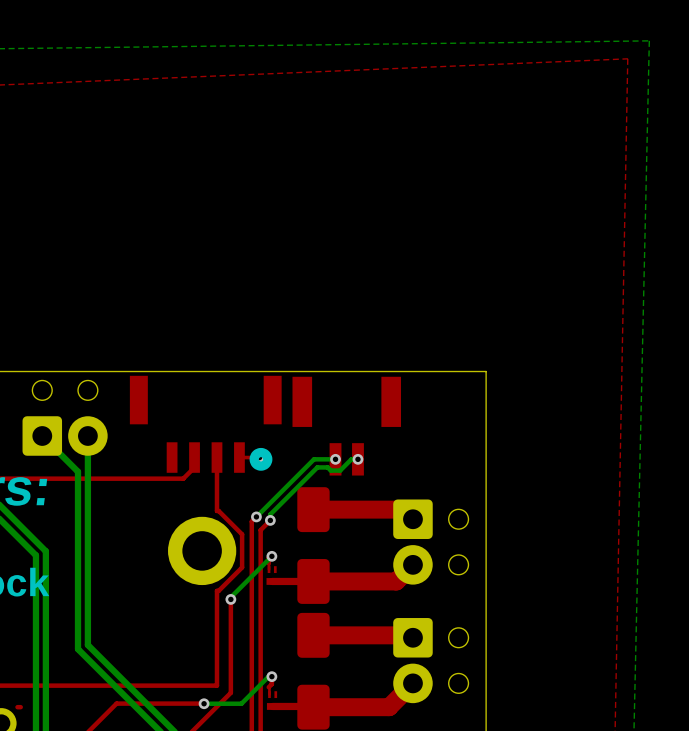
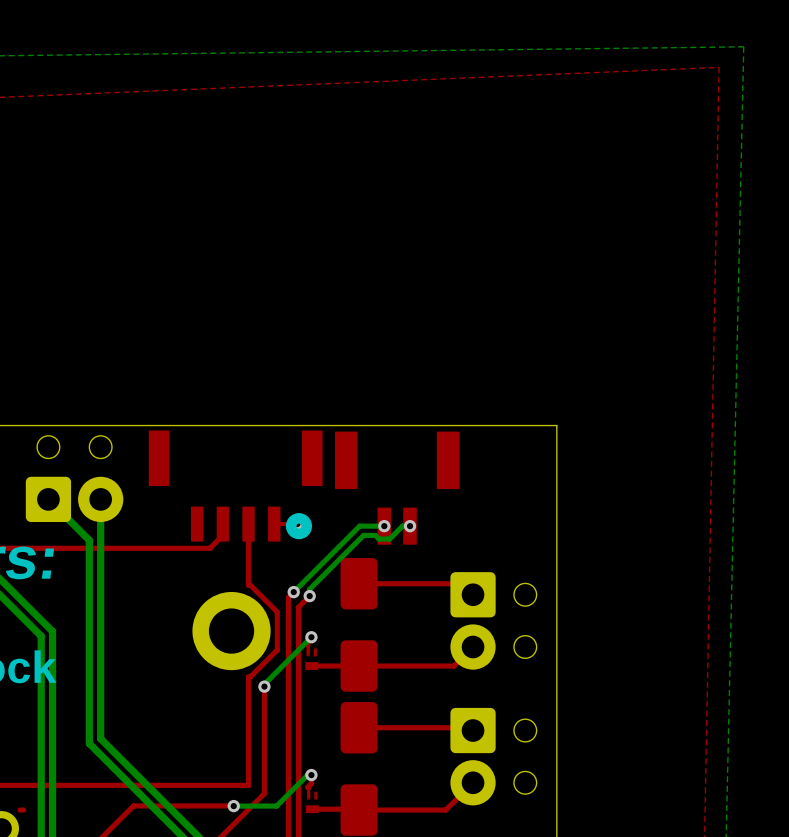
top track width: thick (313, 509) (403, 509) (412, 519) -> thin (359, 583) (462, 583) (473, 594)
top track width: thick (412, 564) (396, 581) (272, 581) -> thin (473, 647) (454, 666) (311, 666)
top track width: thick (313, 635) (410, 635) (412, 637) -> thin (359, 727) (470, 727) (473, 730)
top track width: thick (412, 683) (389, 707) (272, 706) -> thin (473, 782) (445, 810) (312, 809)

